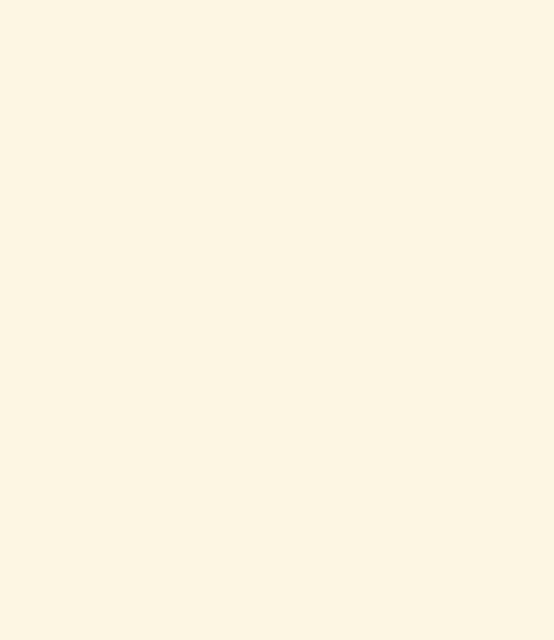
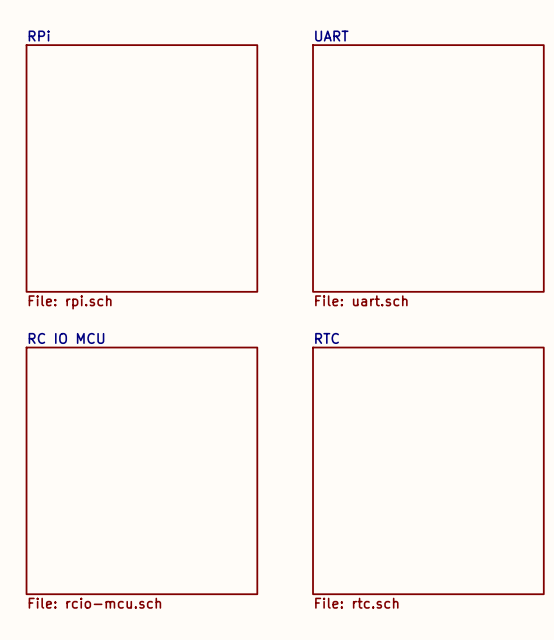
sheet RPi: none -> File: rpi.sch (141, 168)
sheet UART: none -> File: uart.sch (428, 168)
sheet RC IO MCU: none -> File: rcio-mcu.sch (141, 470)
sheet RTC: none -> File: rtc.sch (428, 470)

